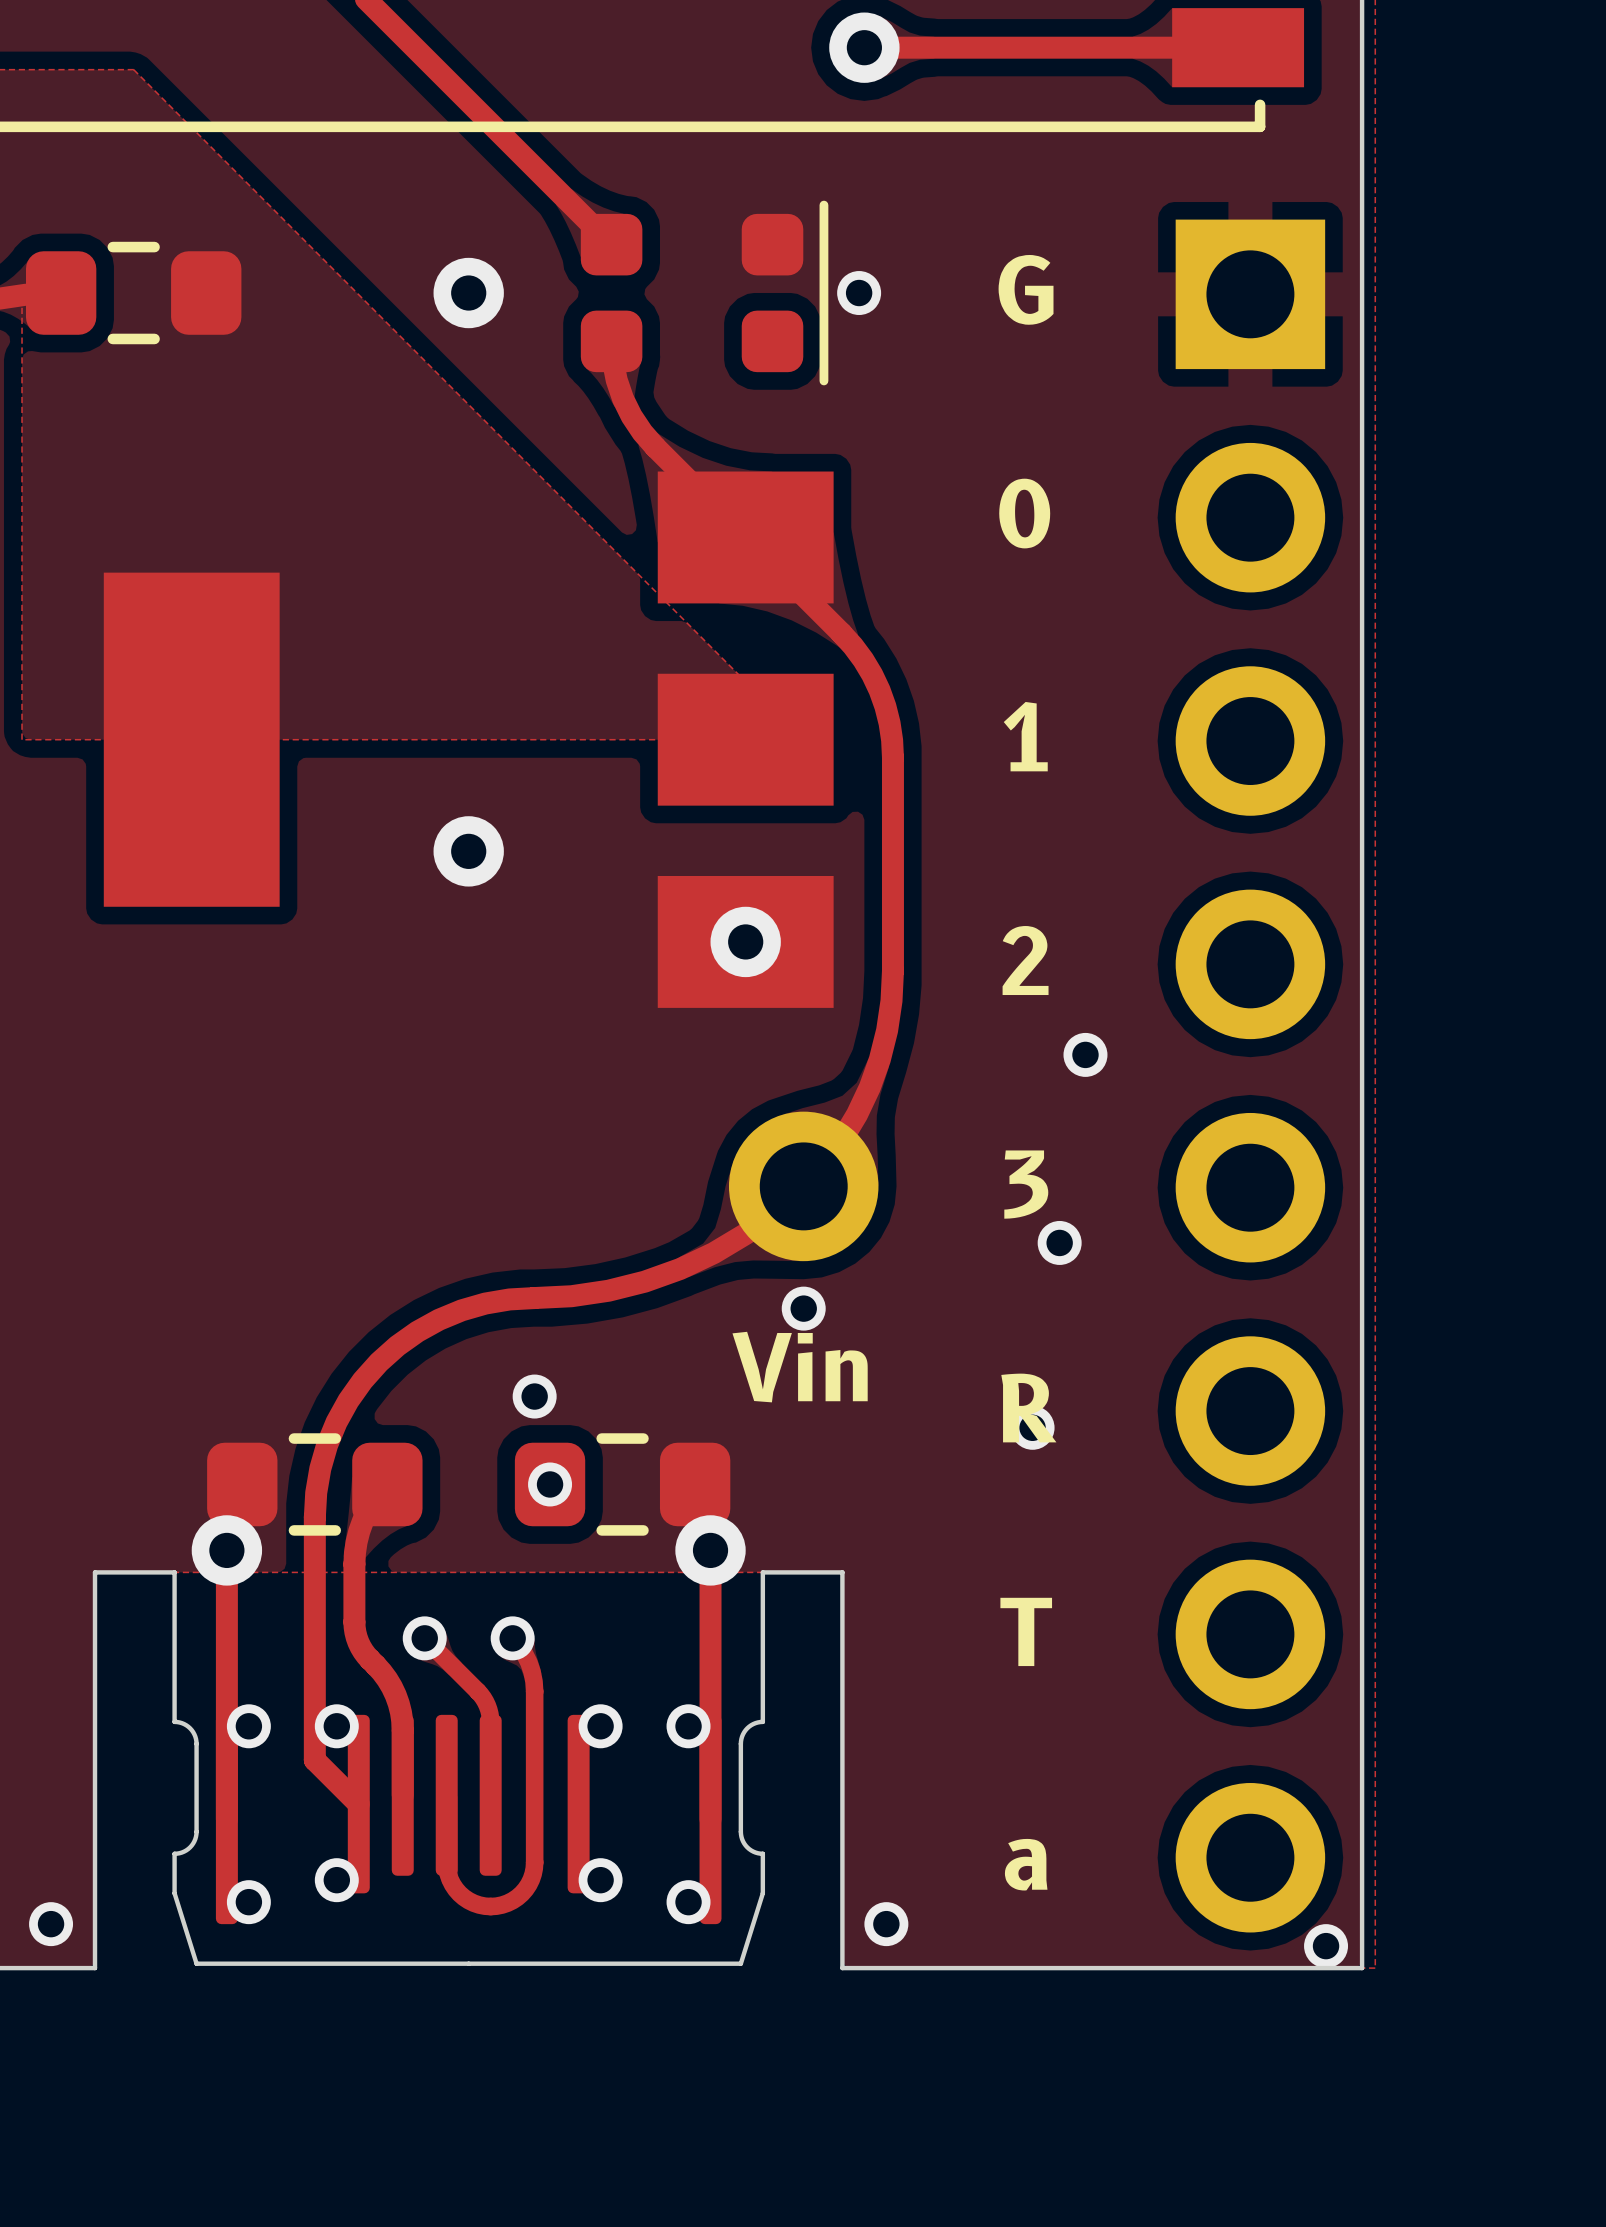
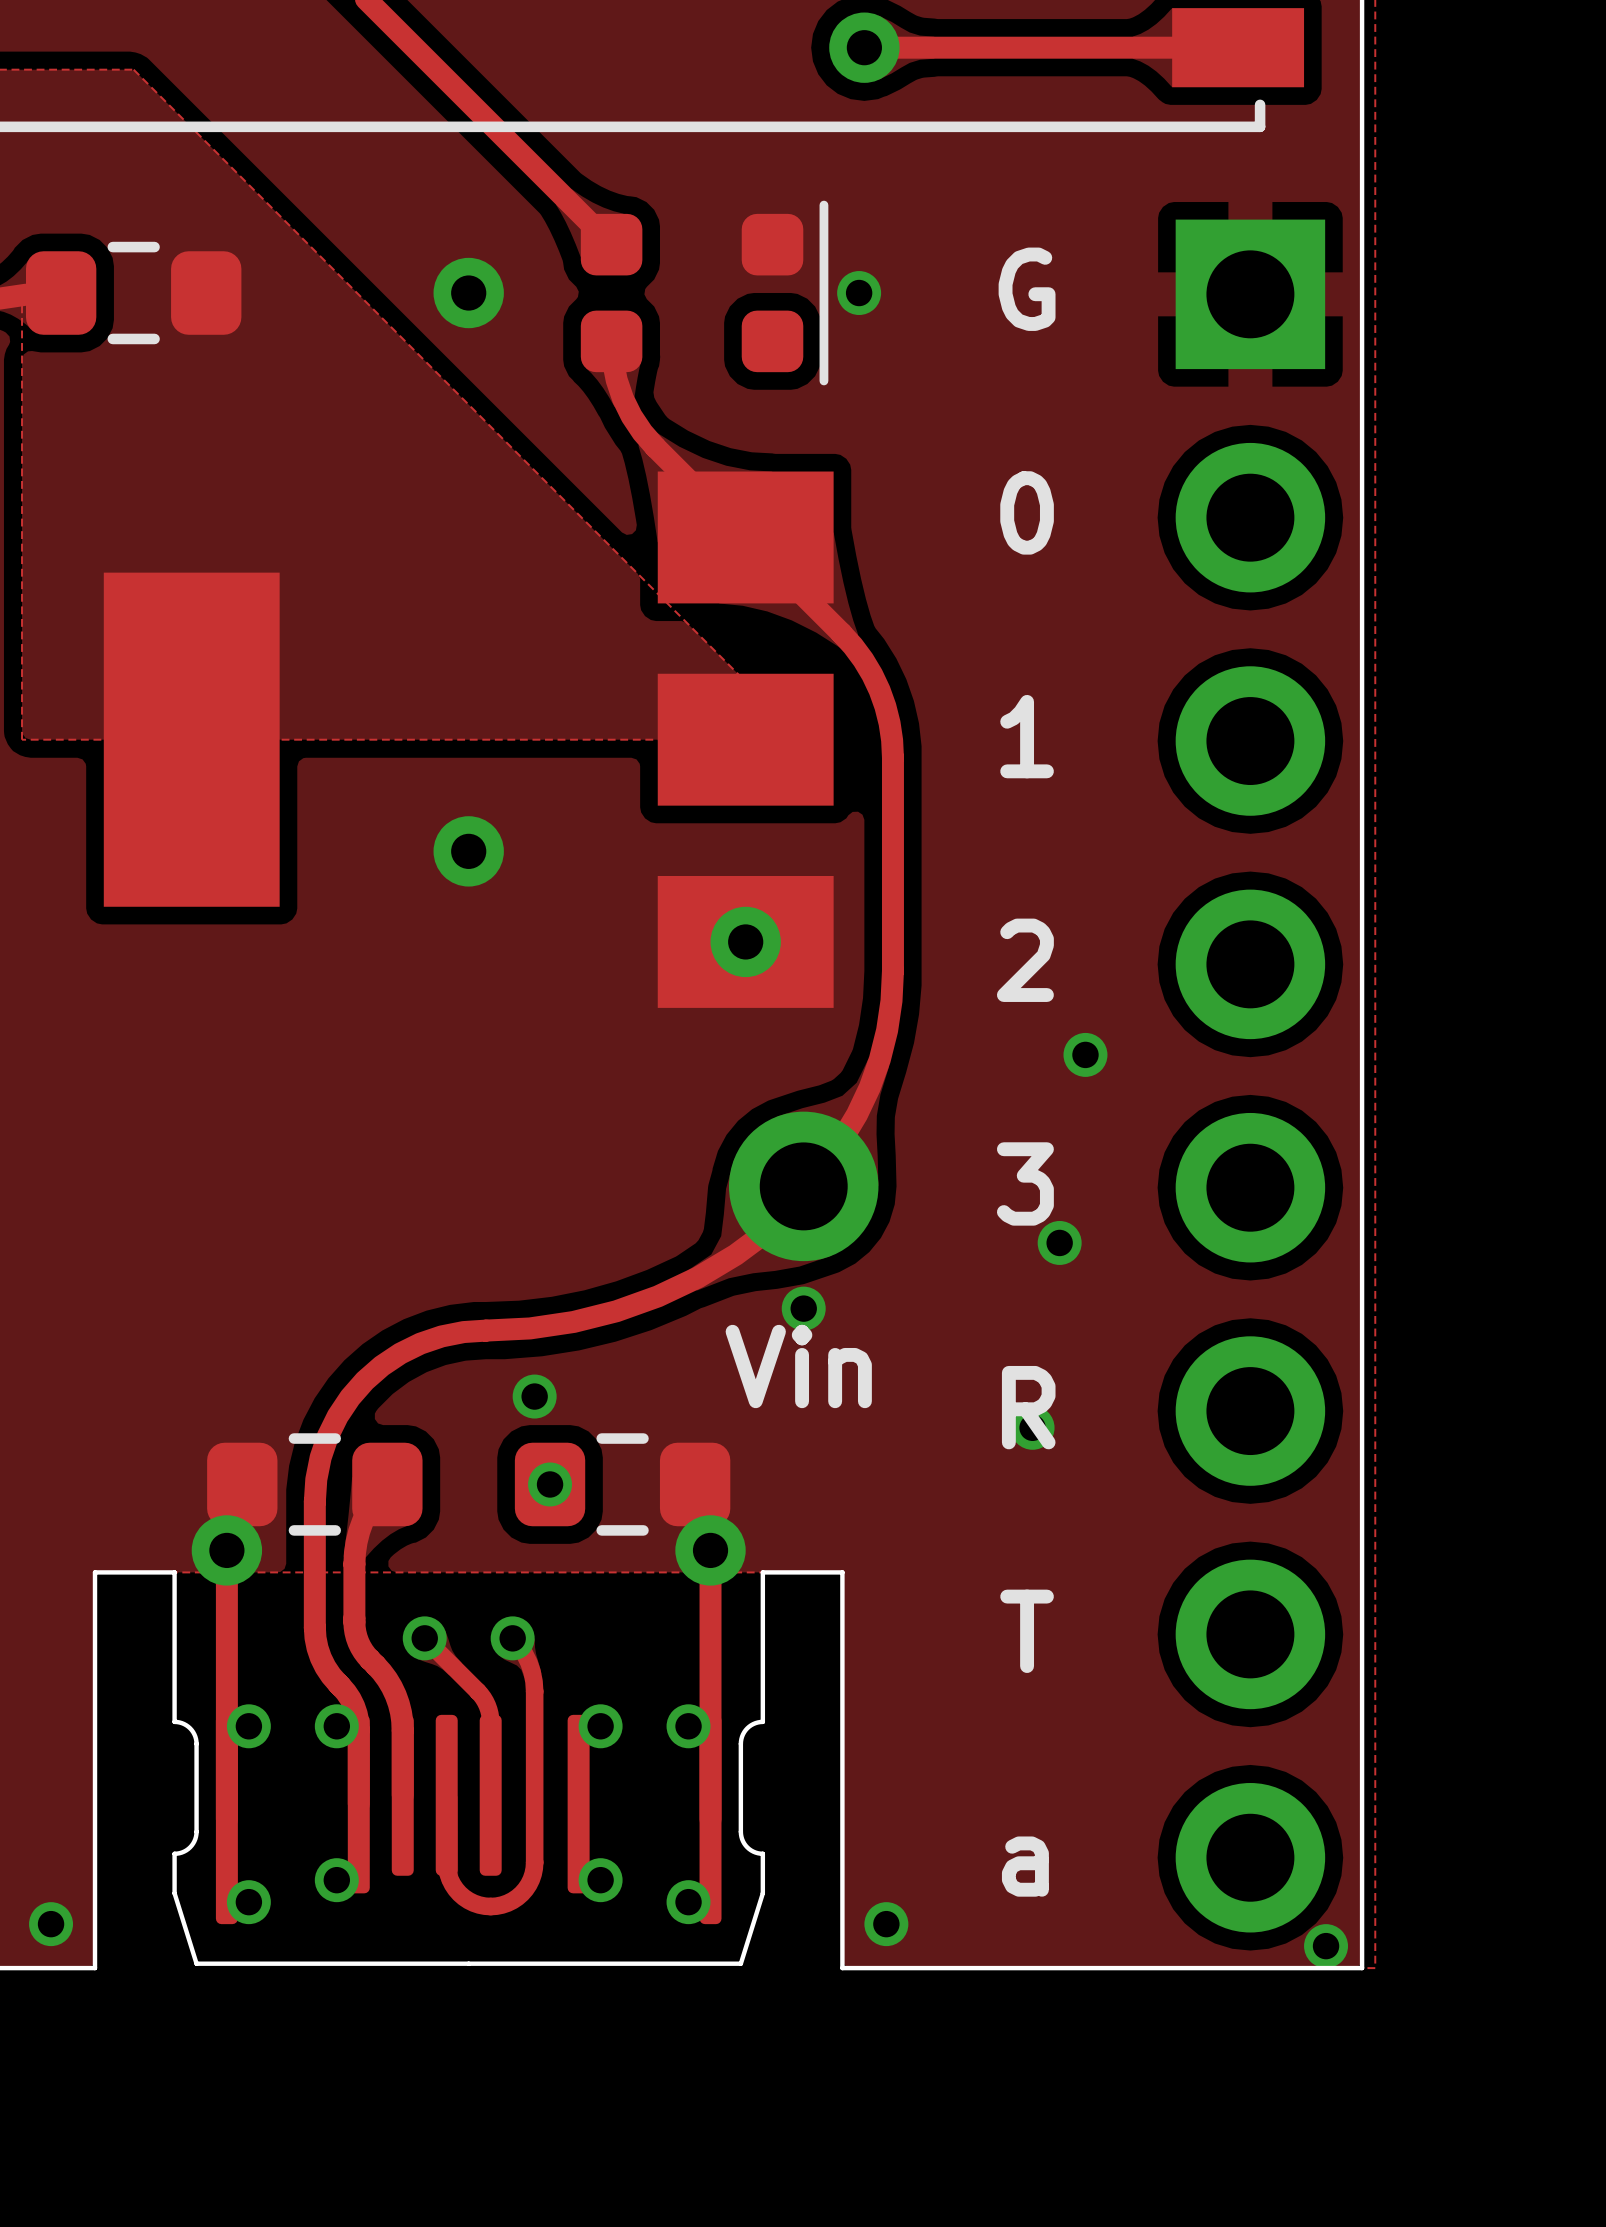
track: (803, 1186) (776, 1211) (745, 1233) (713, 1253) (680, 1269) (644, 1281) (608, 1290) (571, 1296) (509, 1299) (485, 1303) (461, 1310) (417, 1331) (379, 1362) (348, 1400) (336, 1422) (320, 1468) (314, 1517) -> (803, 1186) (803, 1198) (771, 1228) (735, 1254) (697, 1277) (657, 1296) (616, 1311) (573, 1321) (530, 1328) (463, 1332) (441, 1336) (420, 1343) (381, 1365) (350, 1397) (327, 1436) (316, 1479) (314, 1517)
track: (314, 1627) (314, 1760) (358, 1804) -> (314, 1627) (320, 1657) (331, 1675) (350, 1699) (356, 1713) (358, 1729) (358, 1804)

